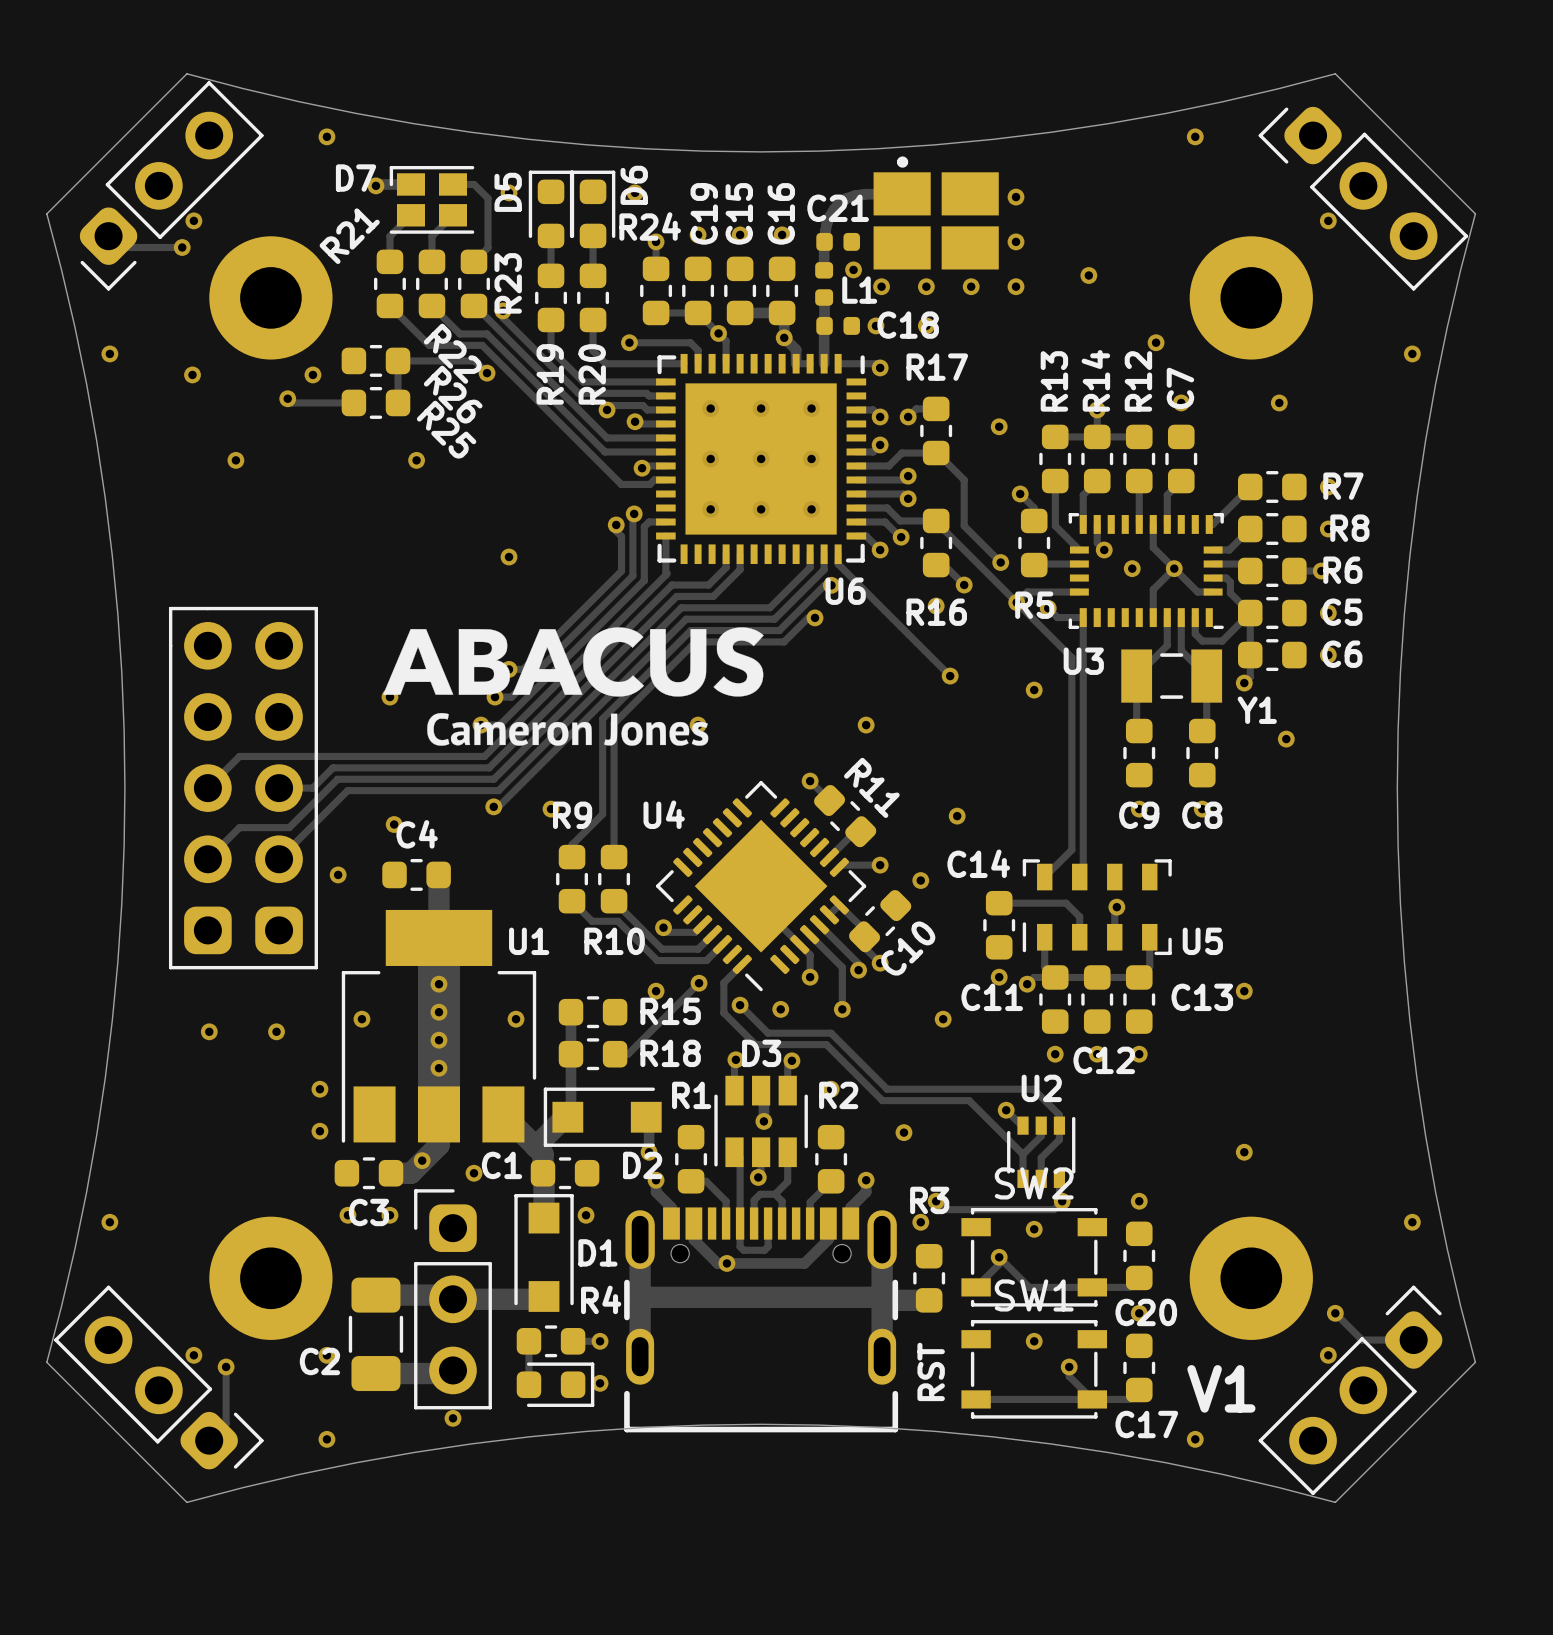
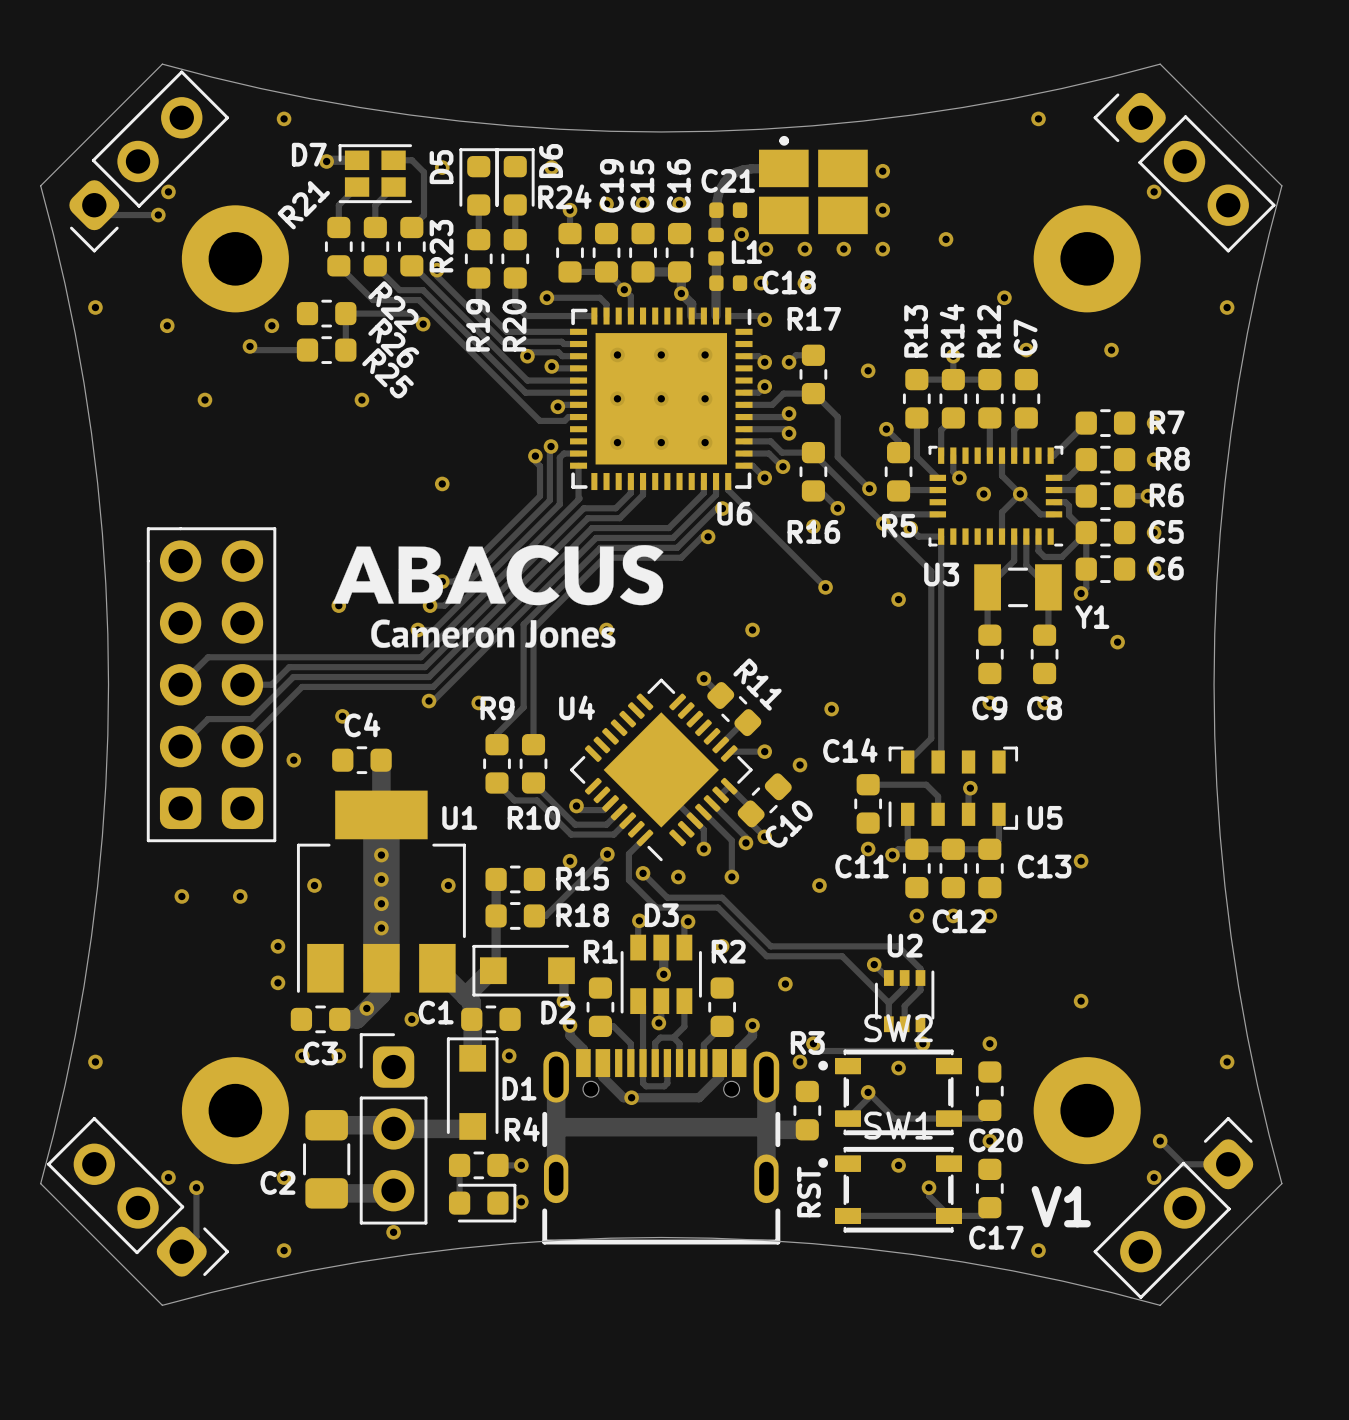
part: none -> (890, 1092)
part: none -> (890, 1189)

